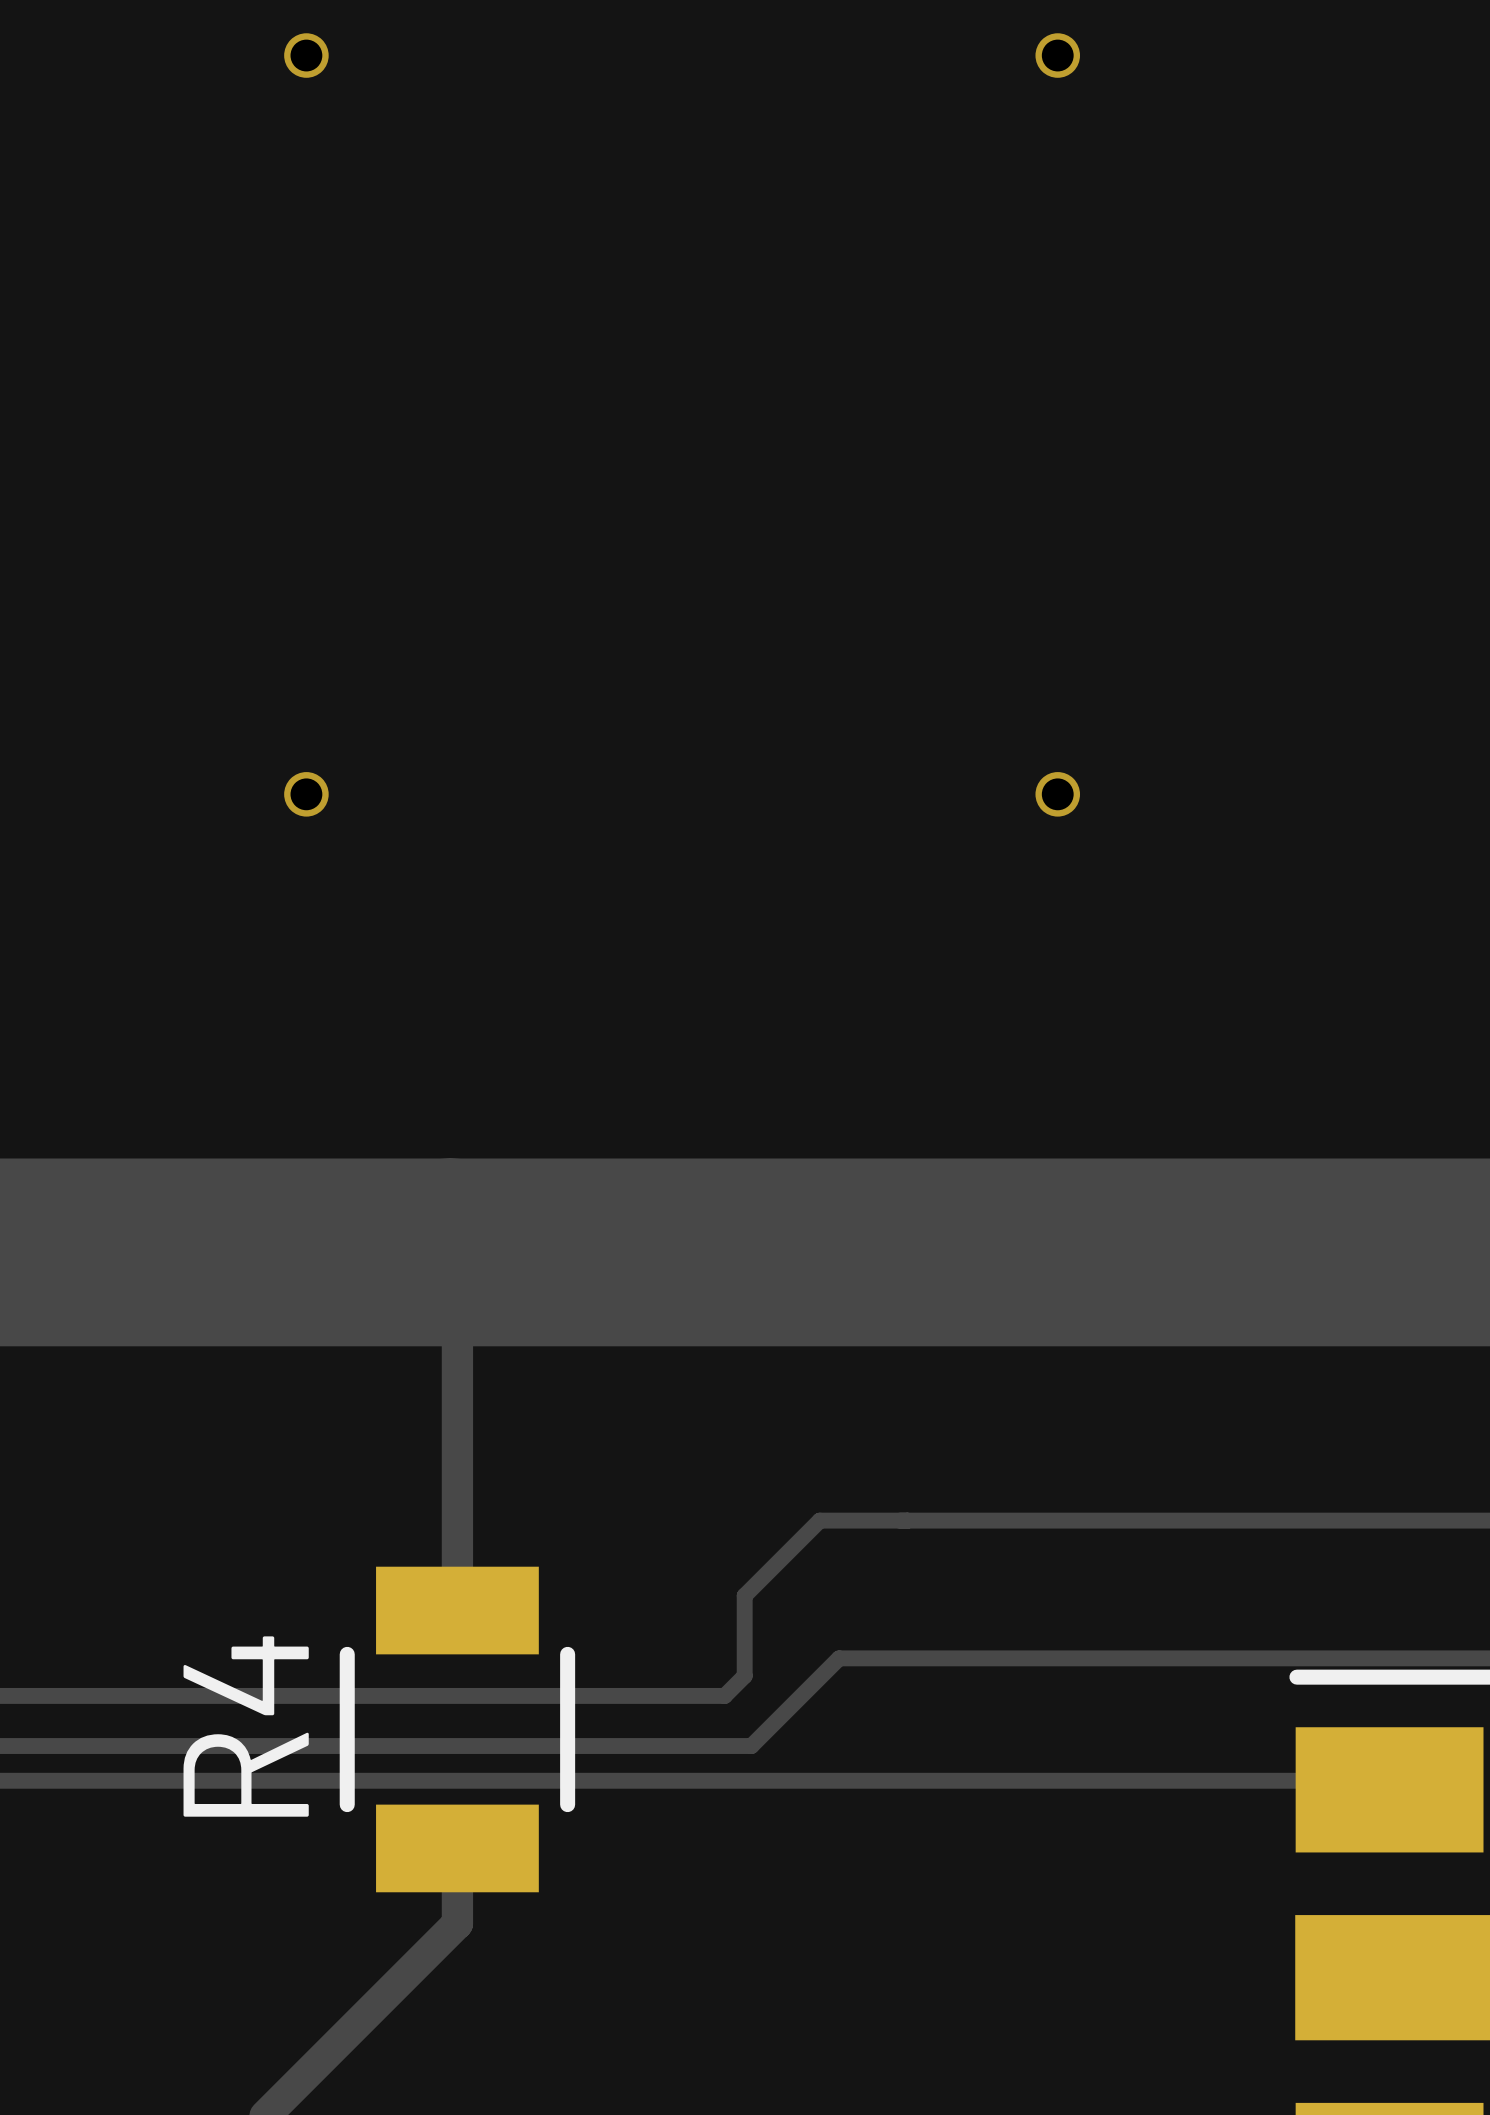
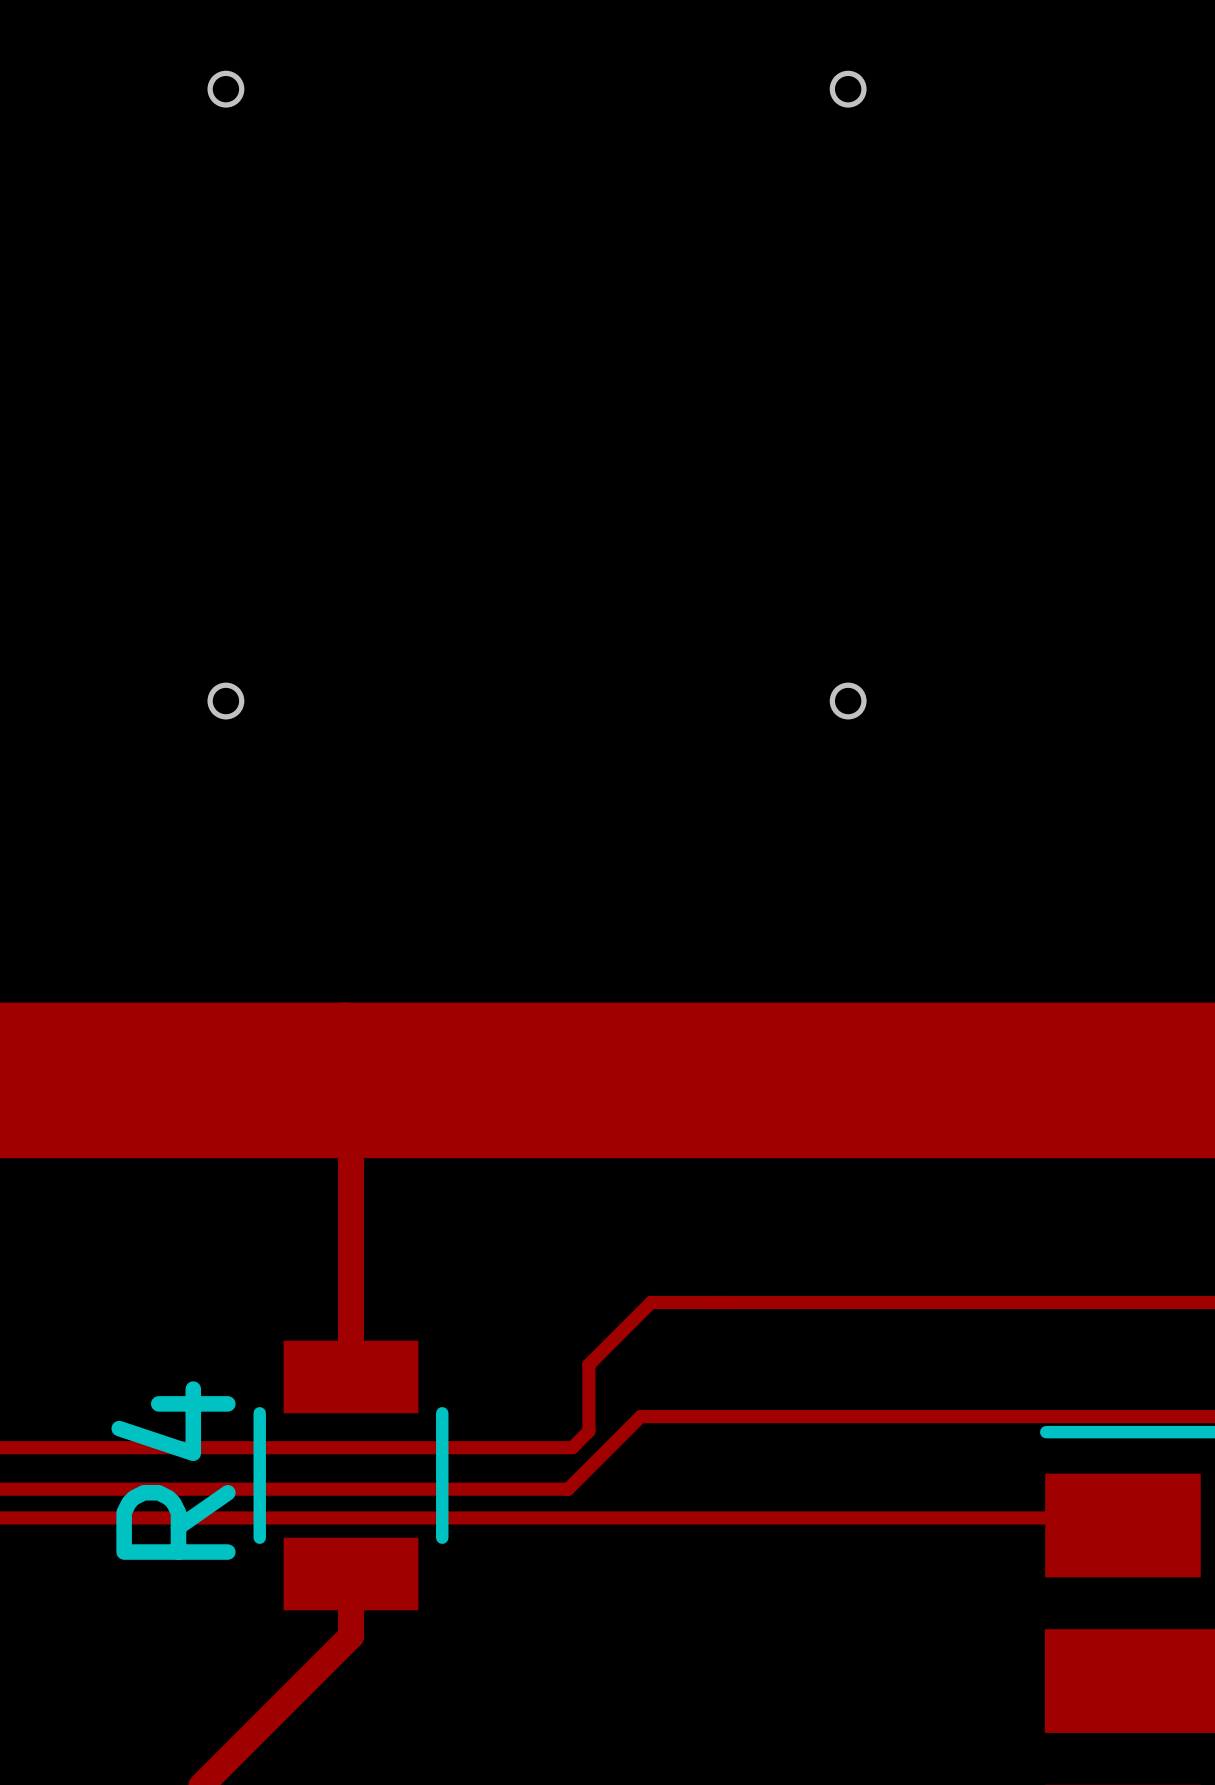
track: (839, 1658) (751, 1746) (719, 1746) -> (667, 1416) (640, 1416) (568, 1489)

